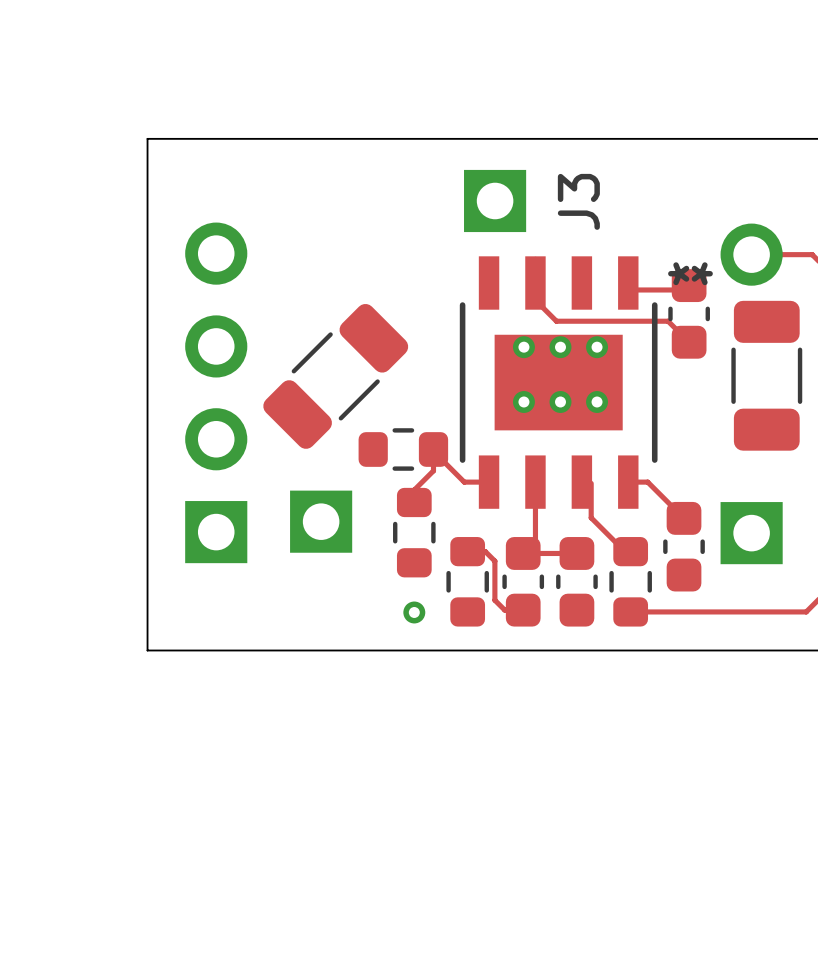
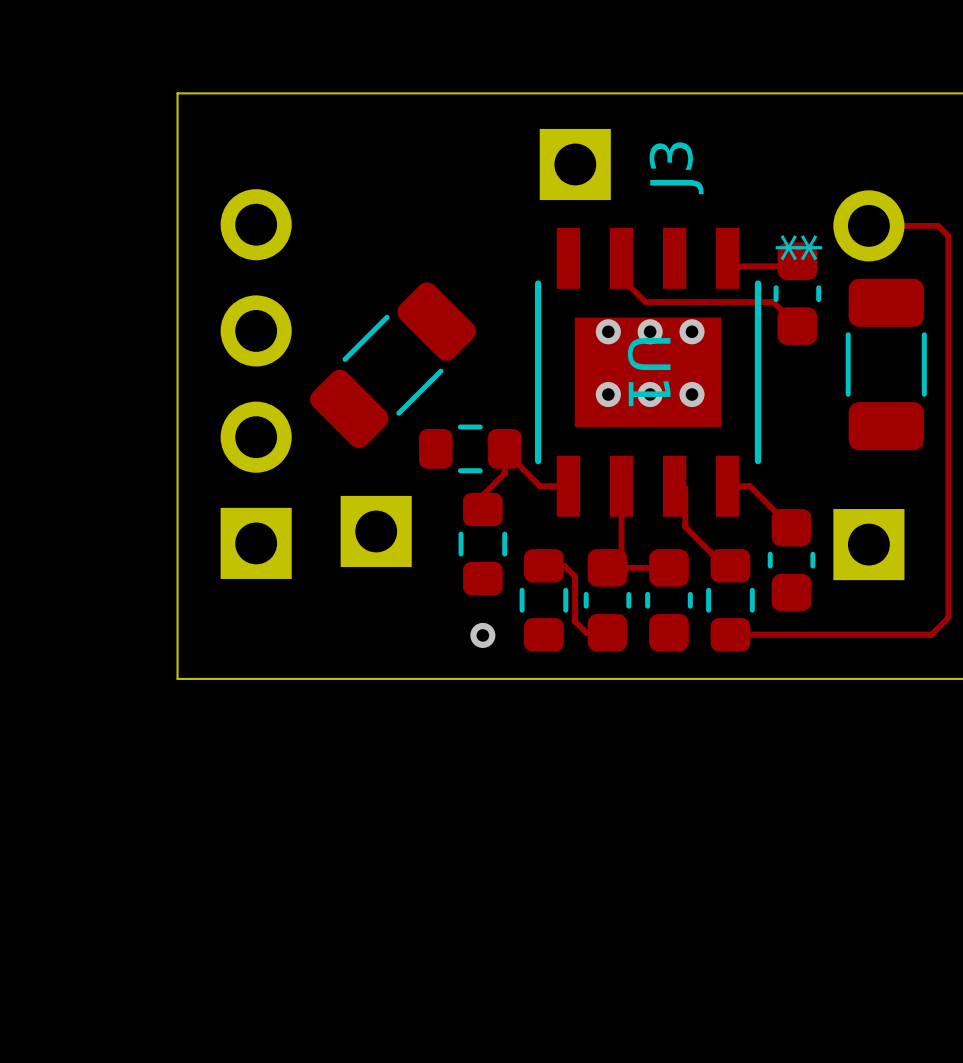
U1 name: none -> U1 (649, 372)

